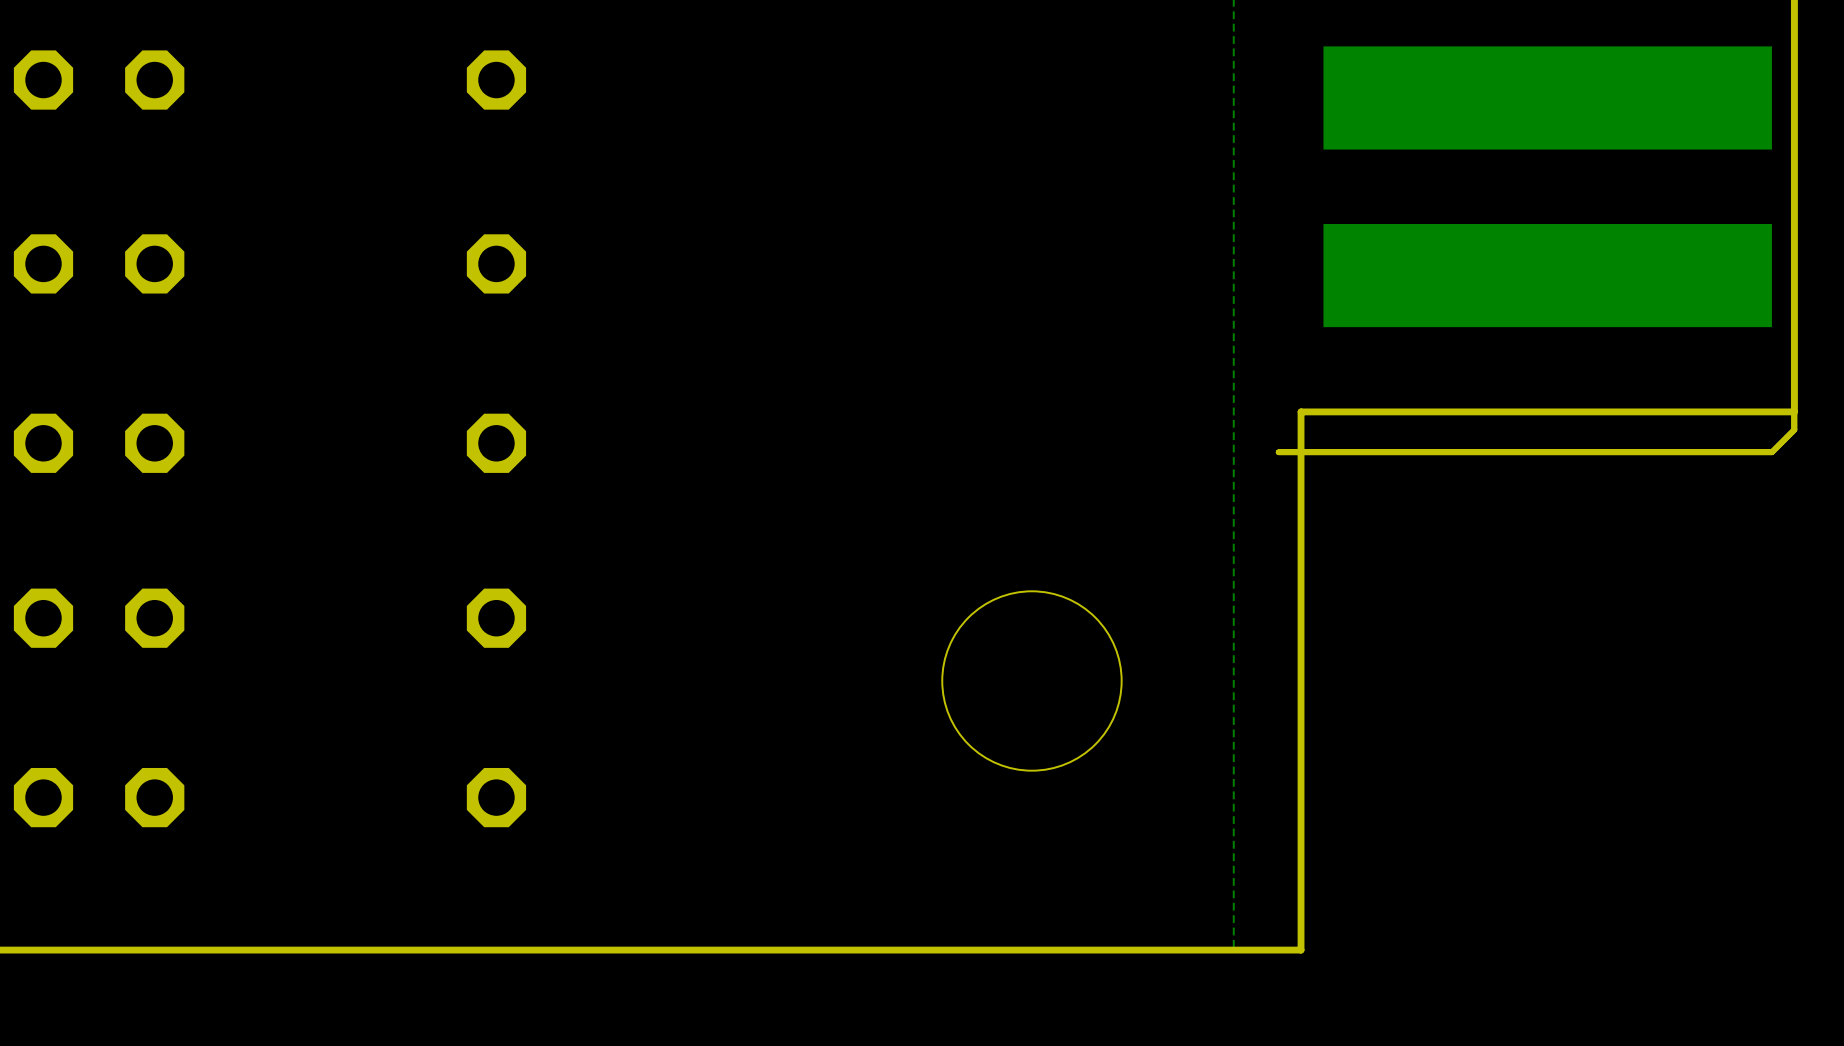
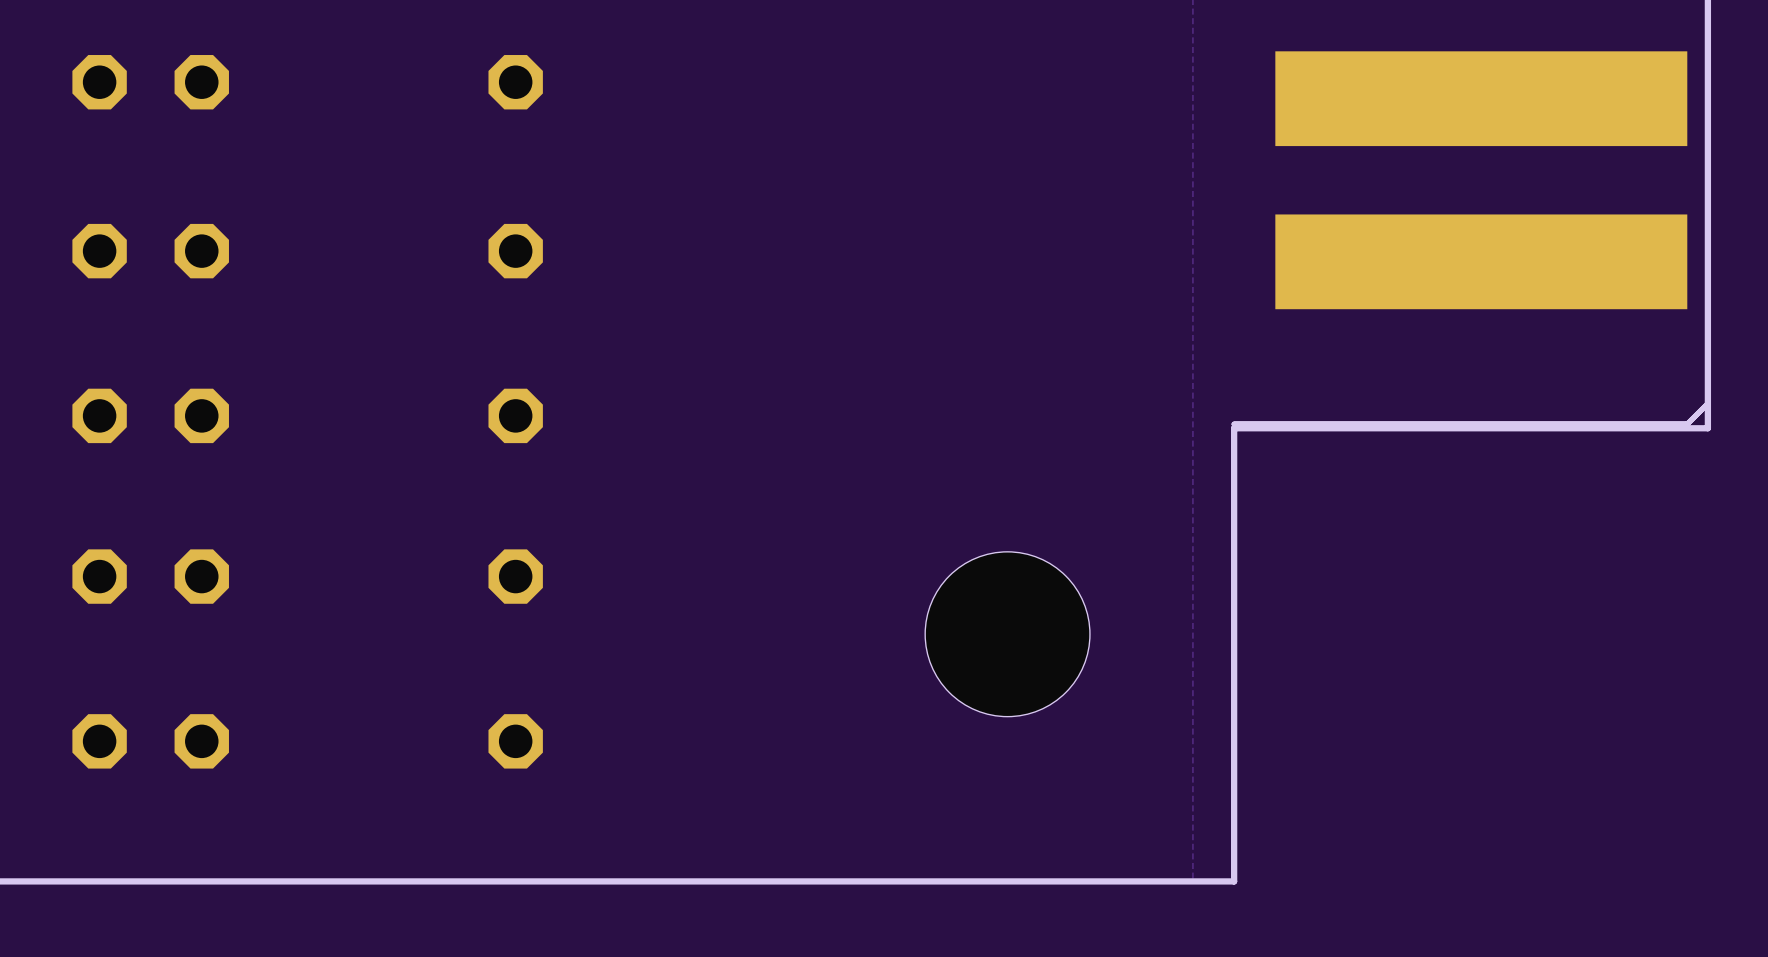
board edge: (1794, 411) (1301, 411) (1301, 950) (1278, 950) -> (1707, 387) (1707, 428) (1234, 428) (1234, 881)

